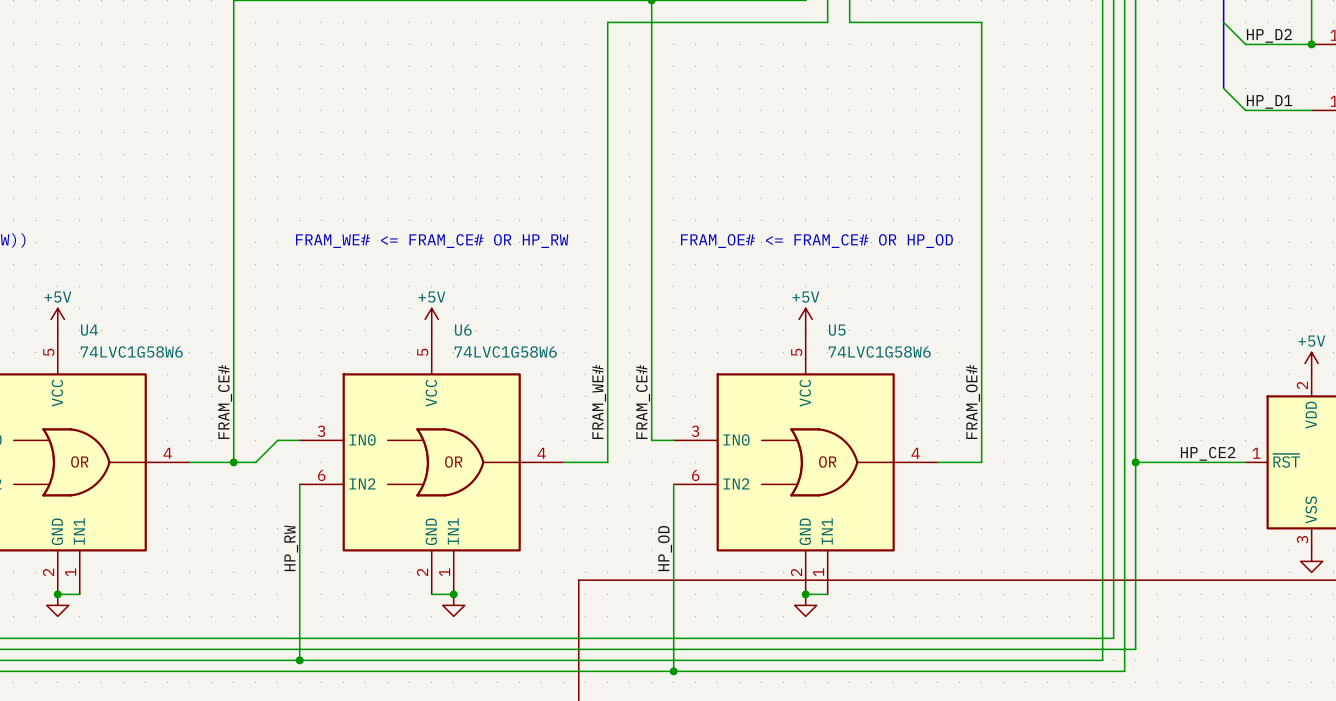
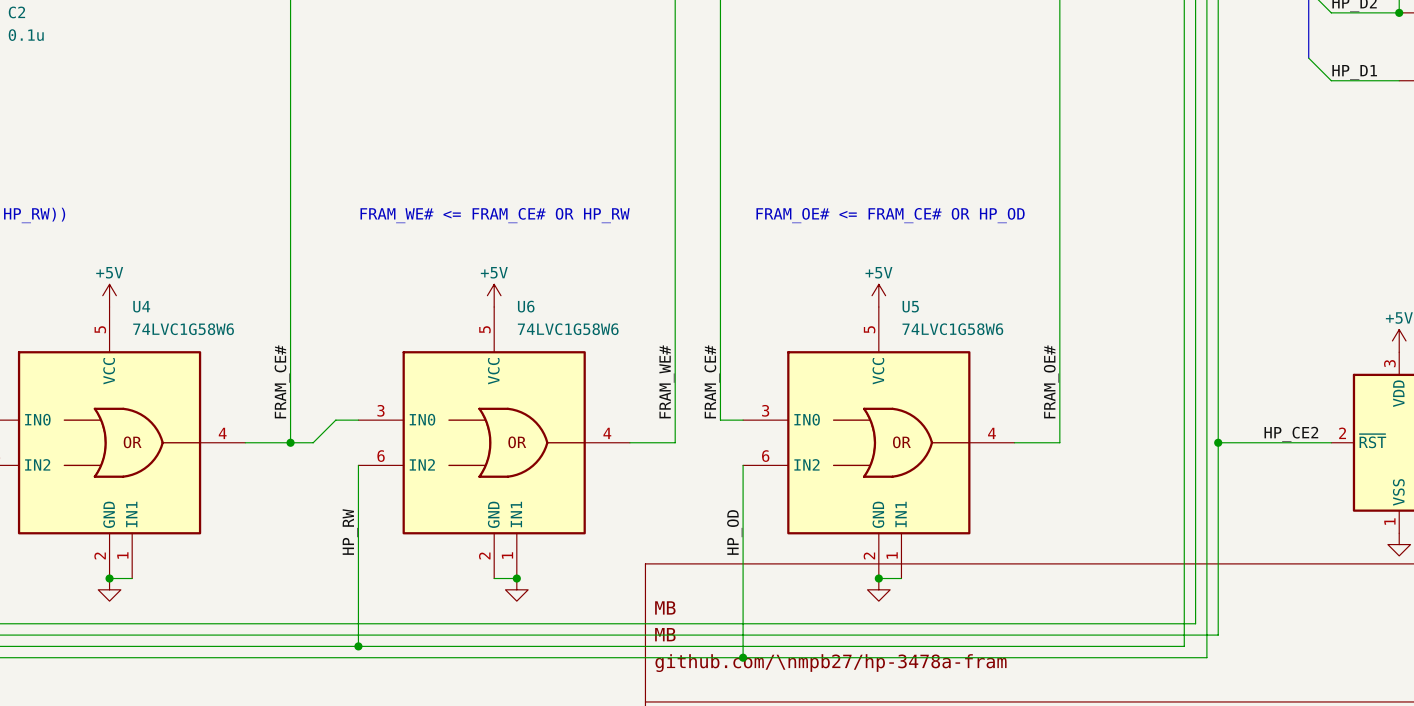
part pin number: 2 (1302, 385) -> 3 (1389, 363)
part pin number: 1 (1256, 453) -> 2 (1342, 433)
part pin number: 3 (1302, 539) -> 1 (1389, 521)
title block: none -> MB (665, 607)
title block: none -> MB (665, 634)
title block: none -> github.com/\nmpb27/hp-3478a-fram (831, 663)

